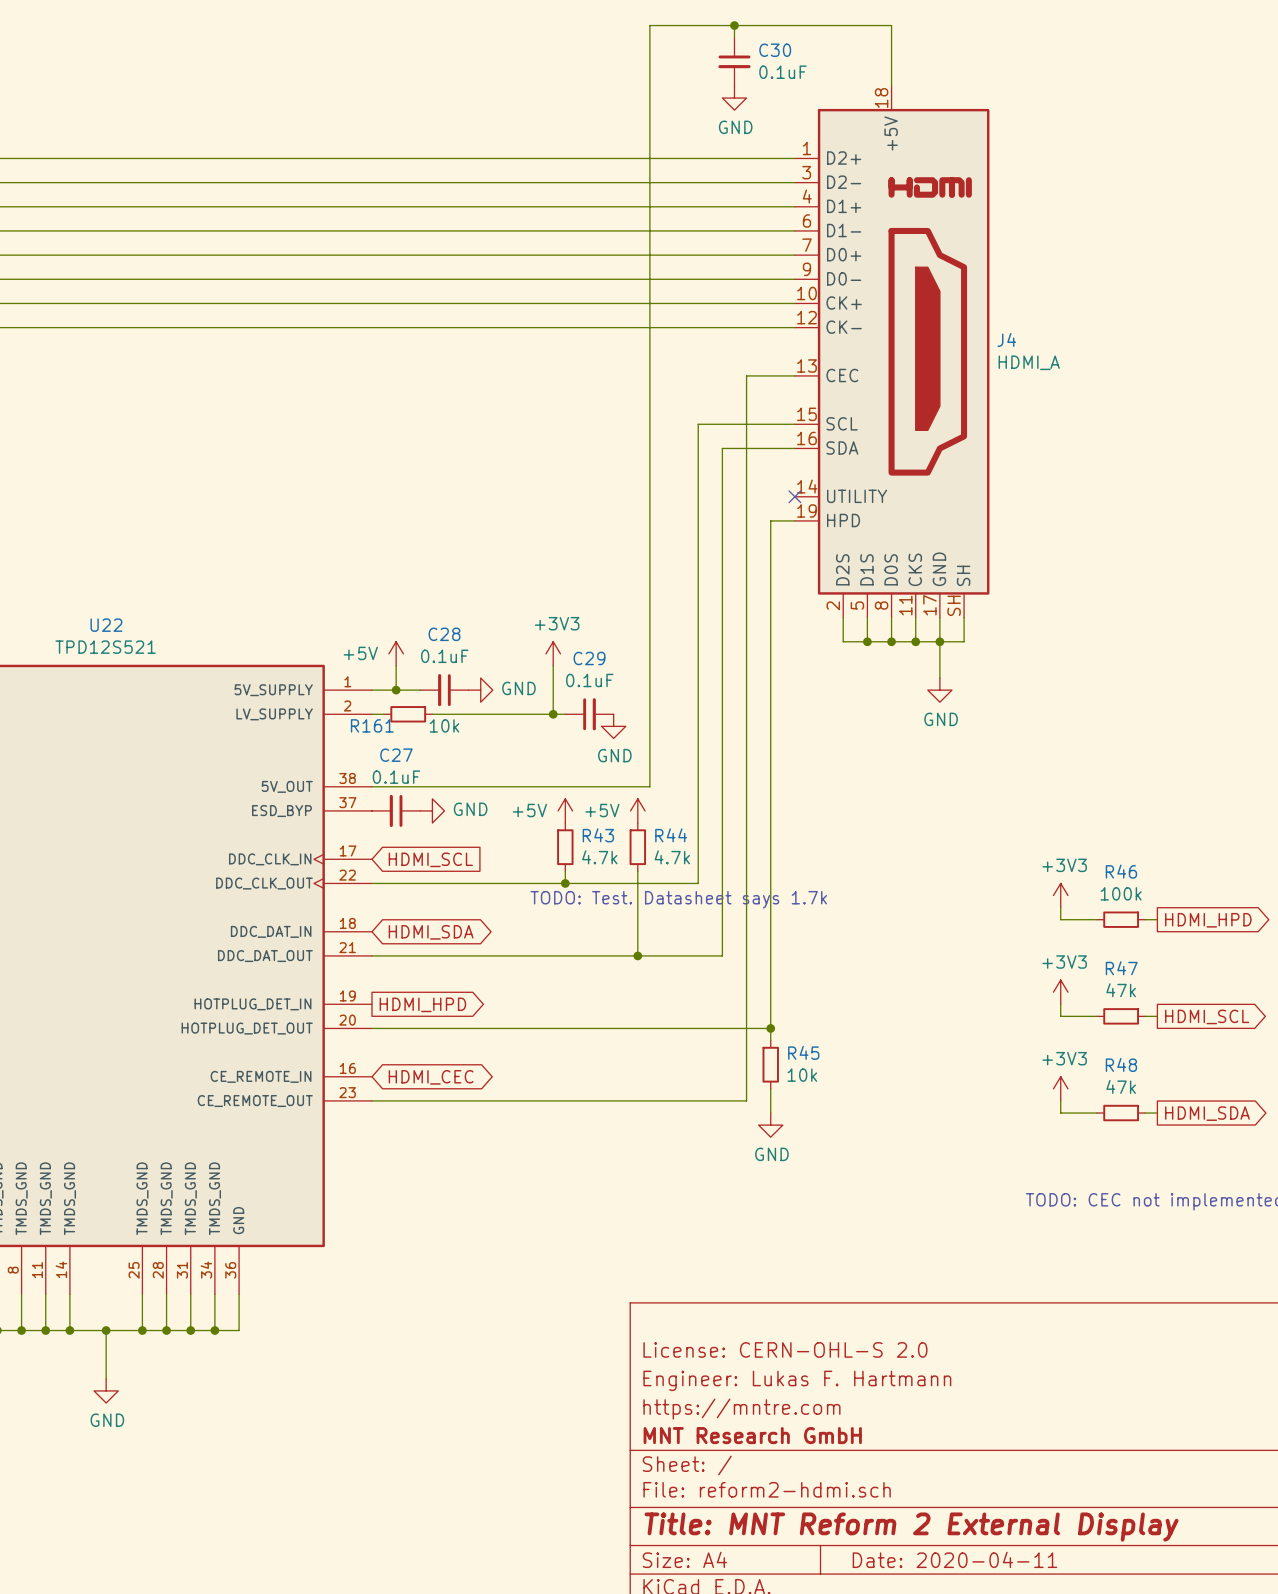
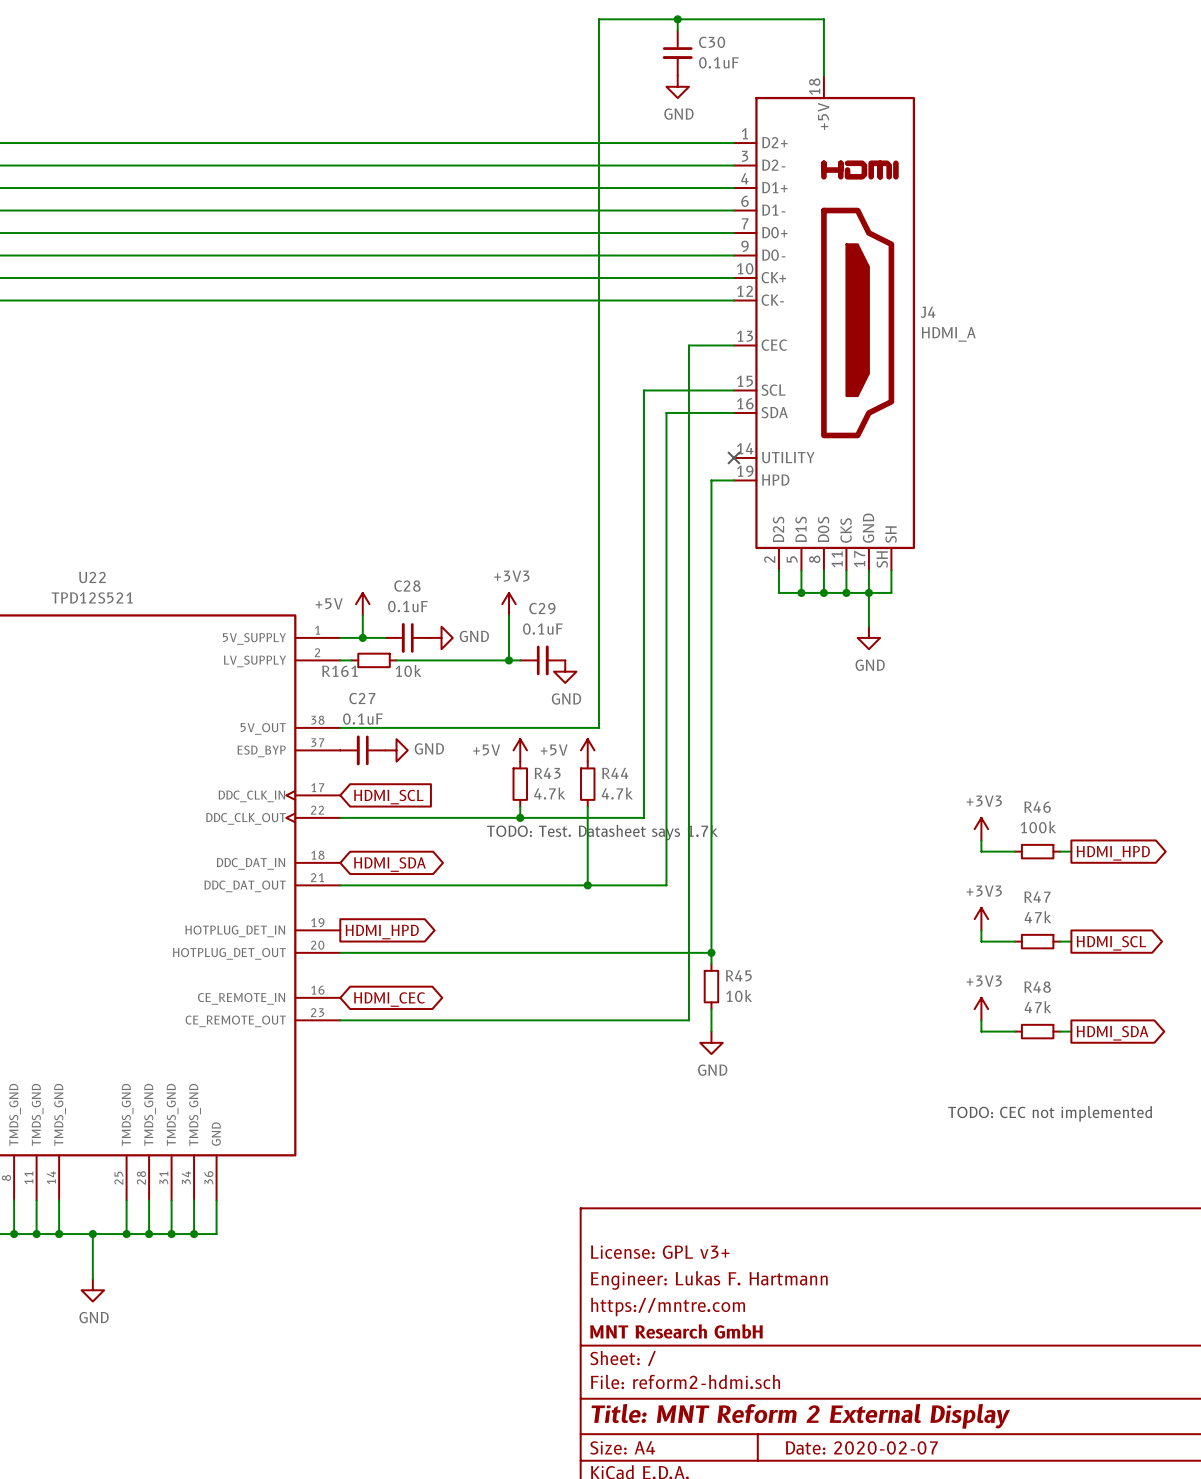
title block: License: CERN-OHL-S 2.0 (785, 1349) -> License: GPL v3+ (660, 1252)
title block: Date: 2020-04-11 (955, 1559) -> Date: 2020-02-07 (861, 1447)

